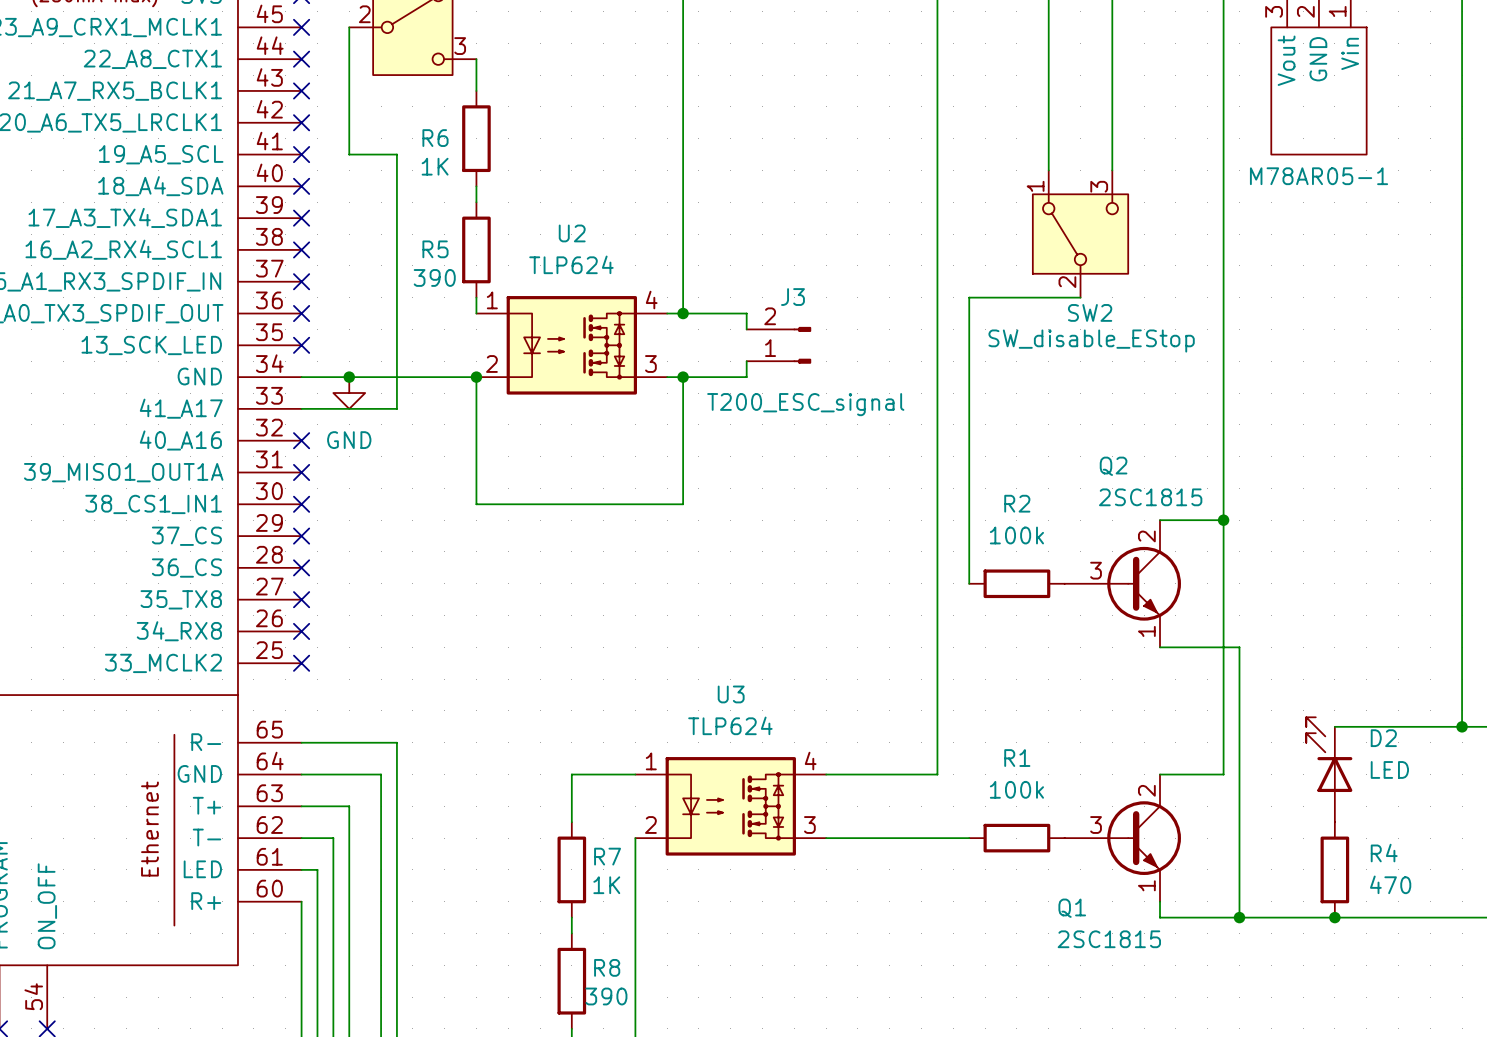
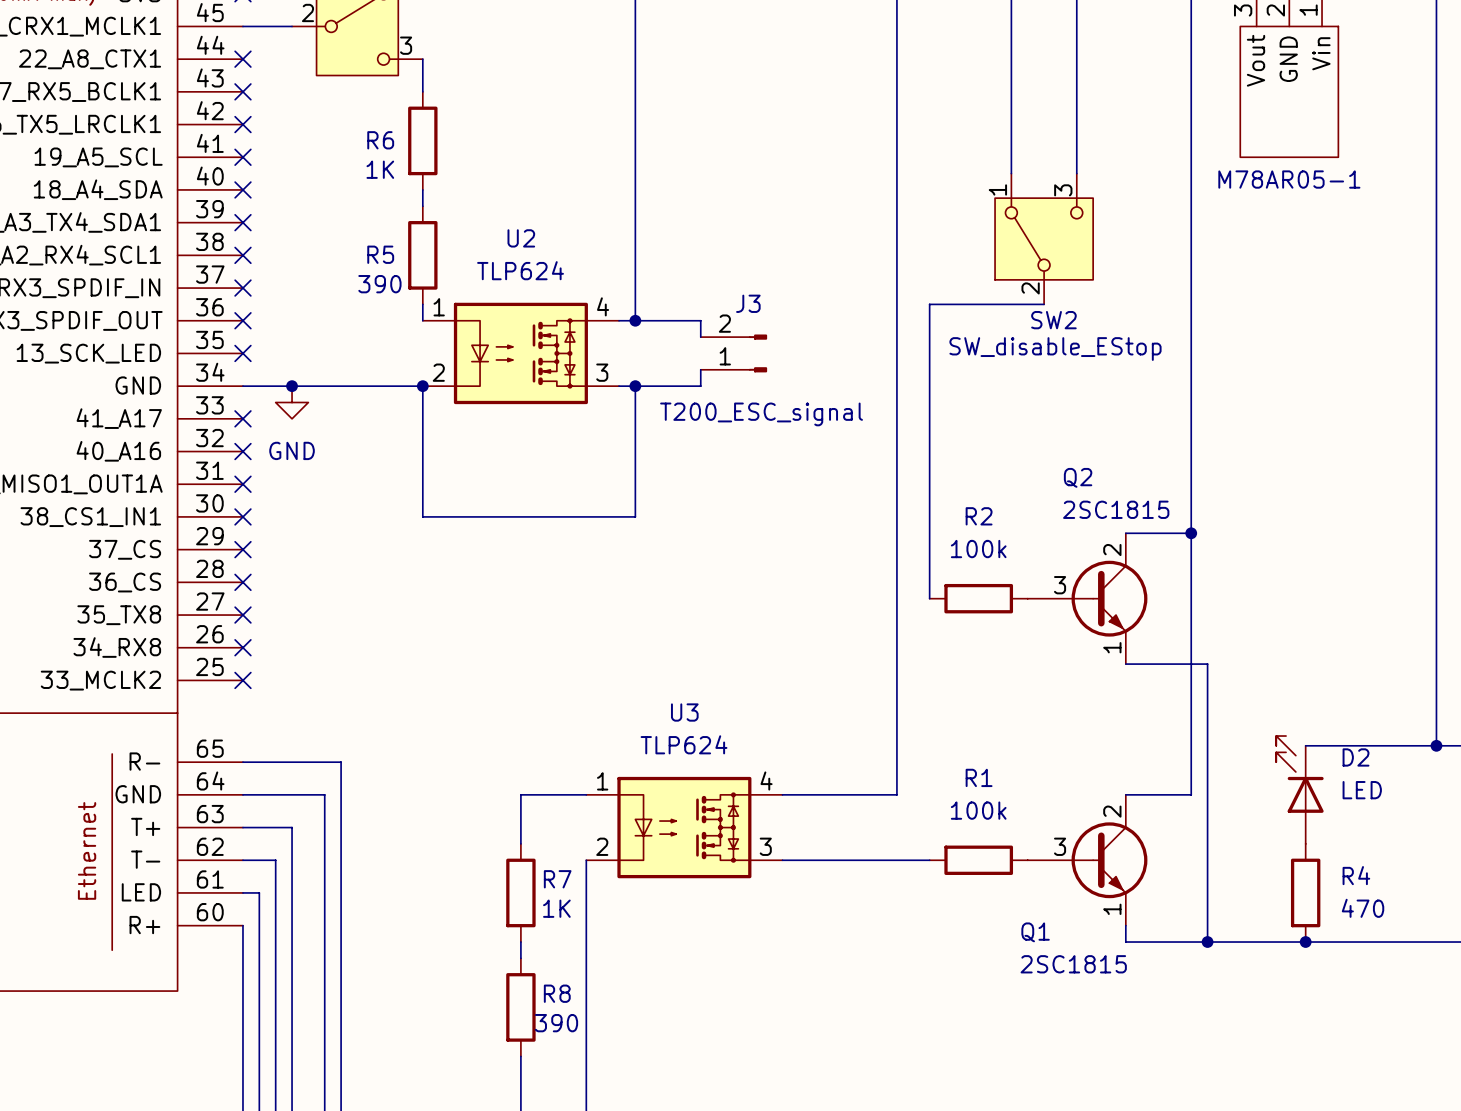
no-connect mark: (301, 27) -> none
wire: (349, 27) (349, 154) (396, 154) (396, 408) (301, 408) -> (292, 26) (242, 26)
no-connect mark: none -> (242, 418)

